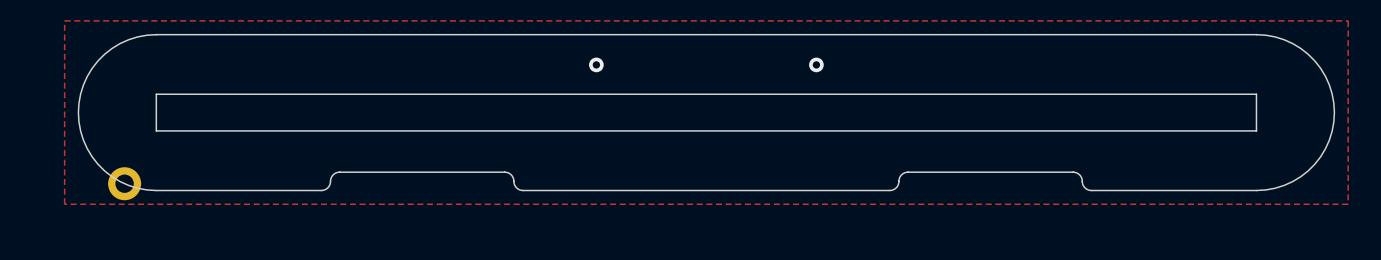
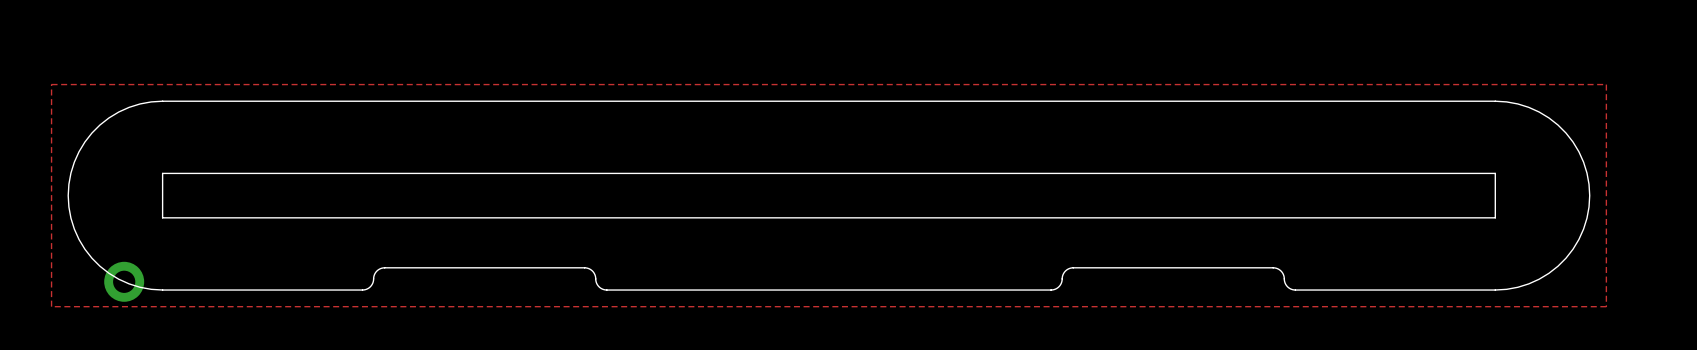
via: (596, 64) -> none
via: (816, 64) -> none

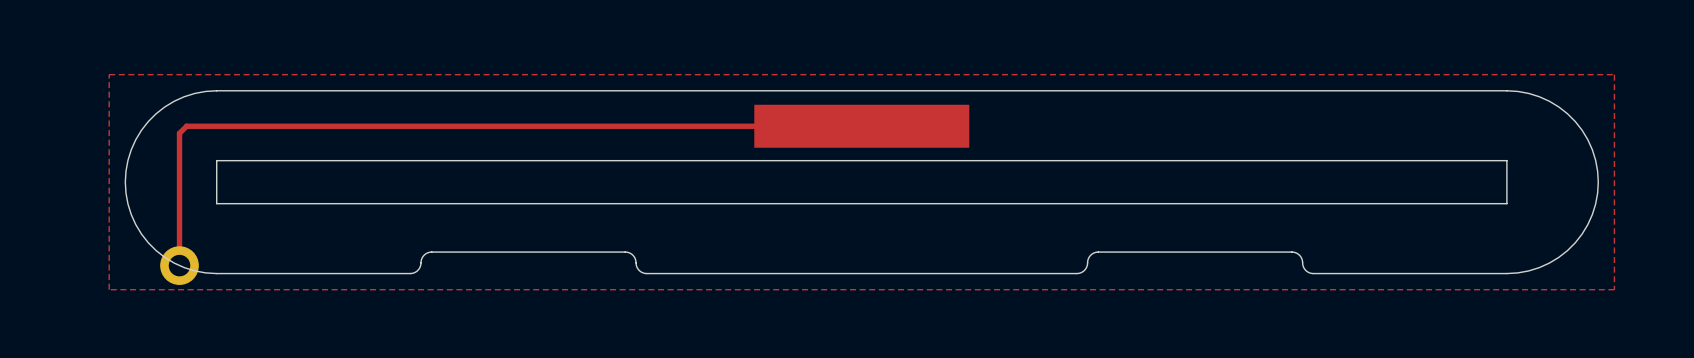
track: none -> (861, 126) (186, 126) (179, 133) (179, 257)
part: none -> (861, 126)

